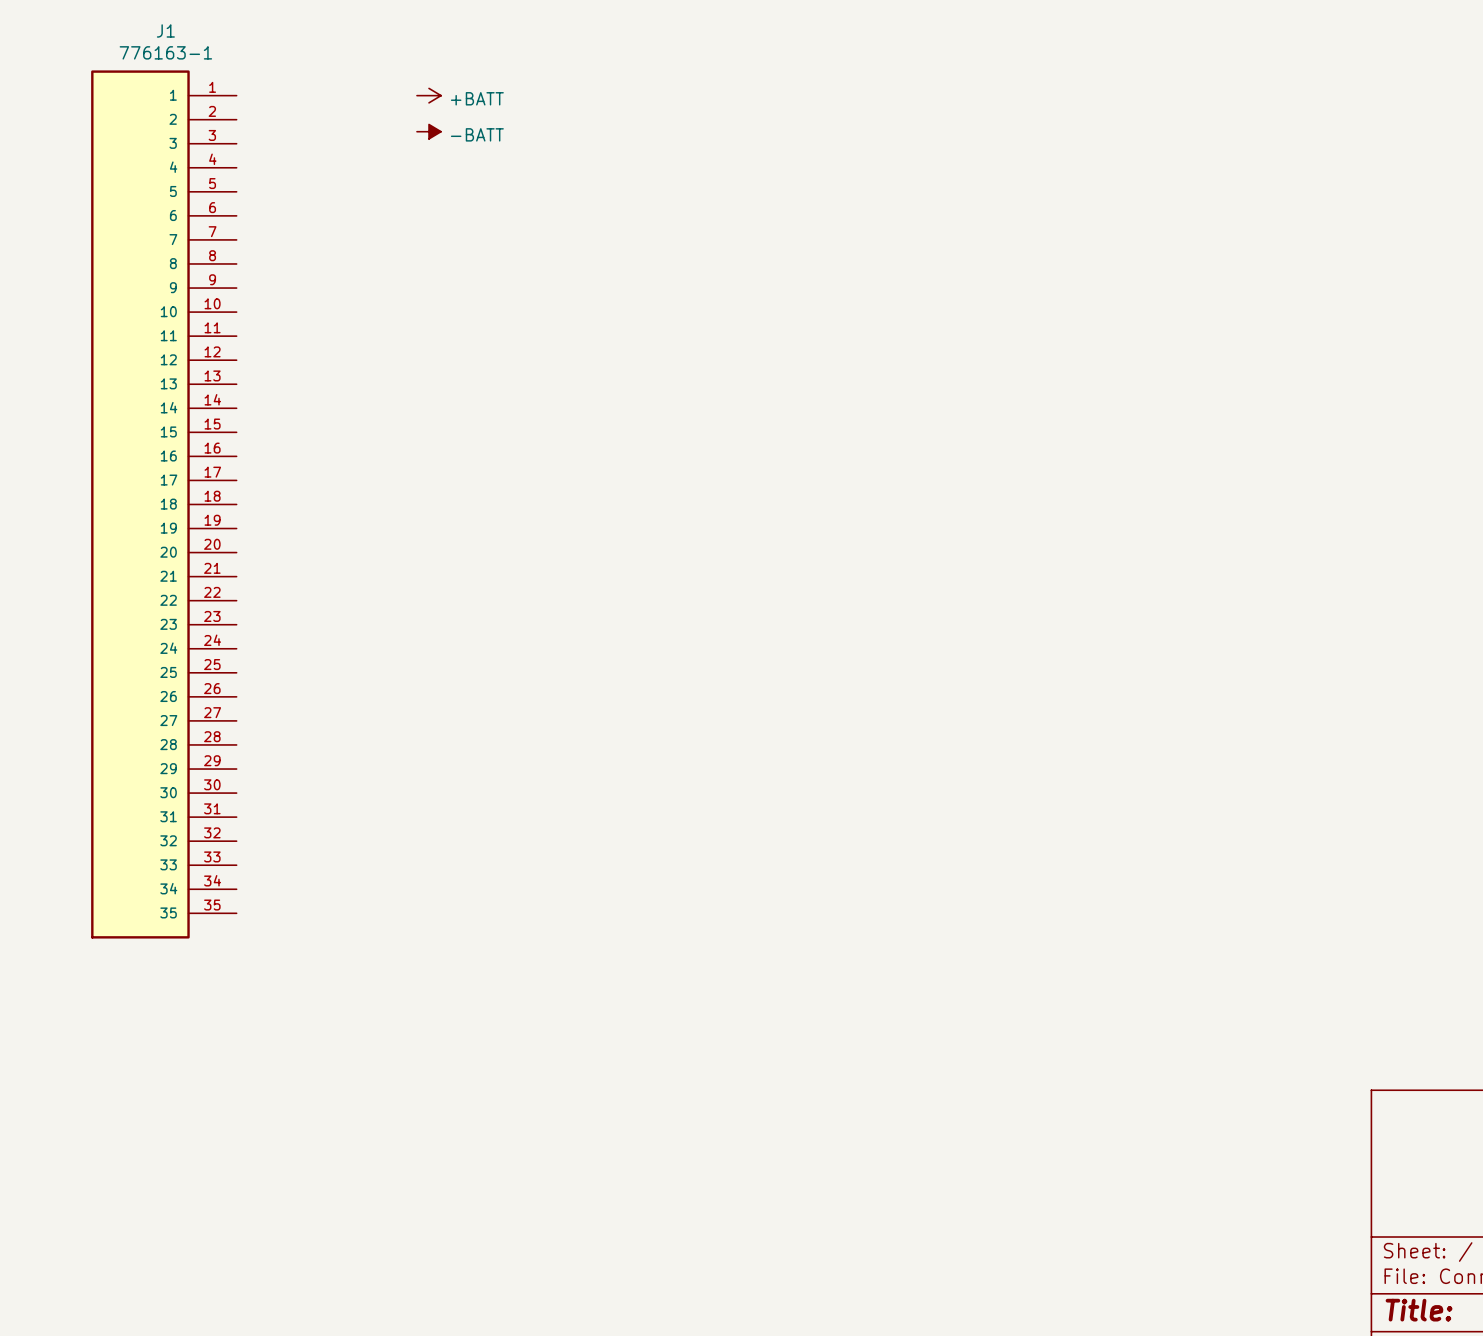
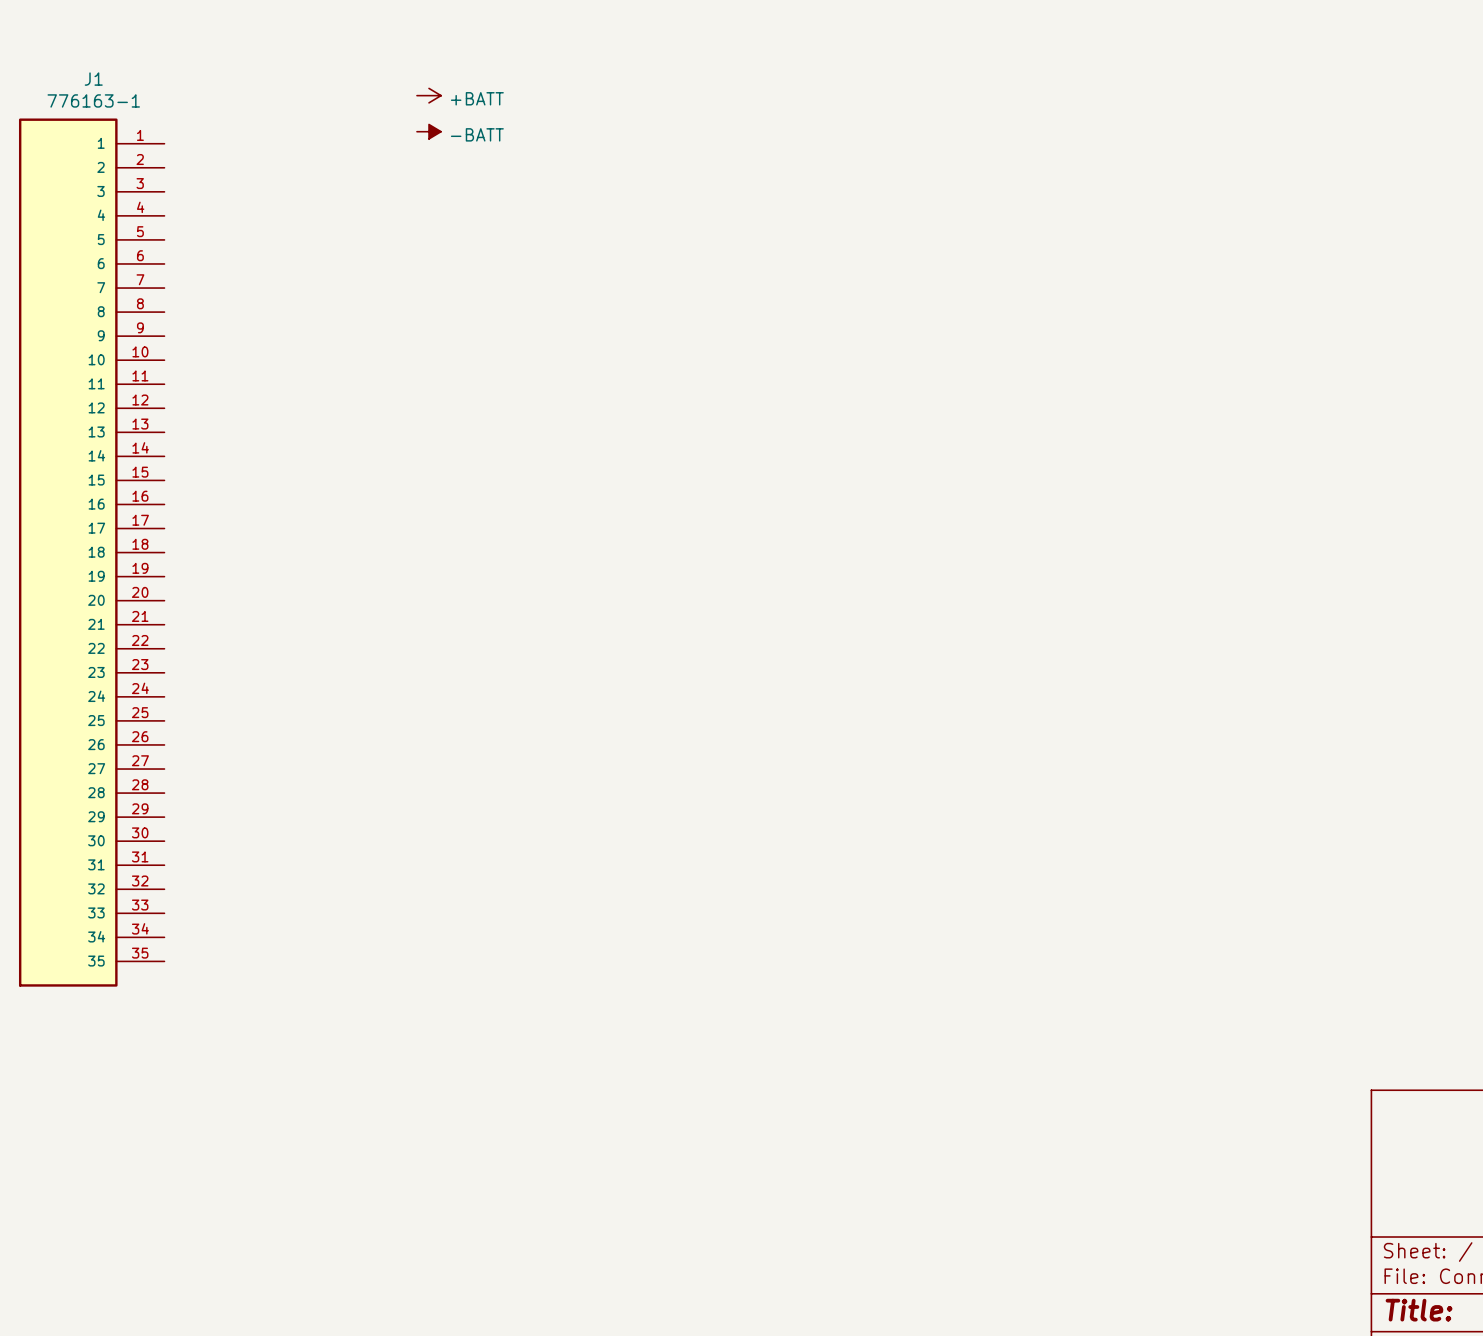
J1 position: (163, 504) -> (91, 552)

